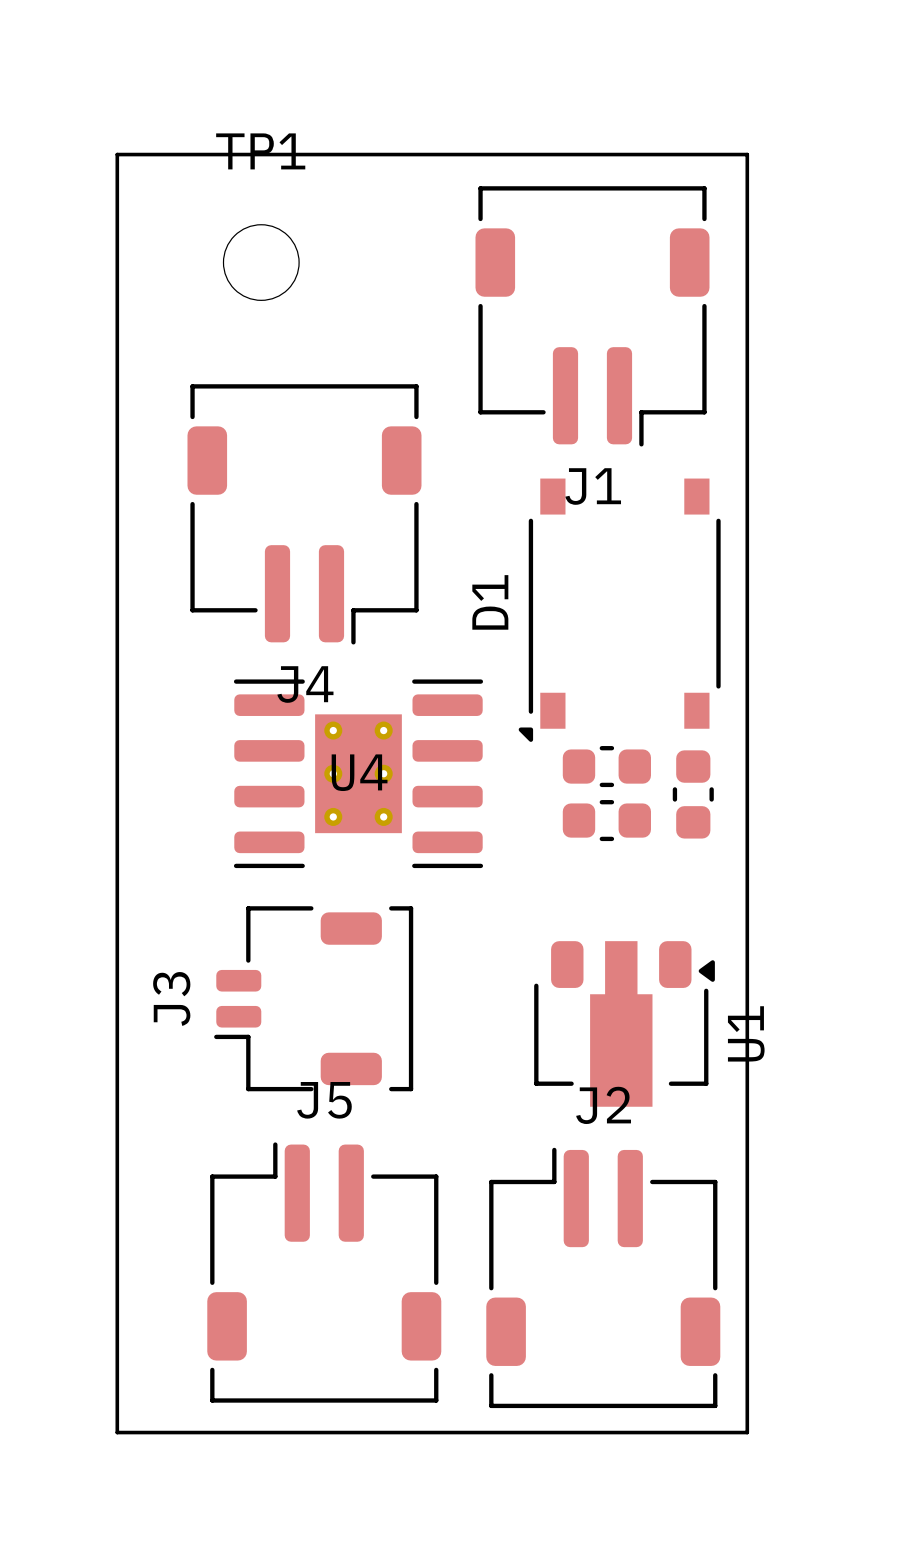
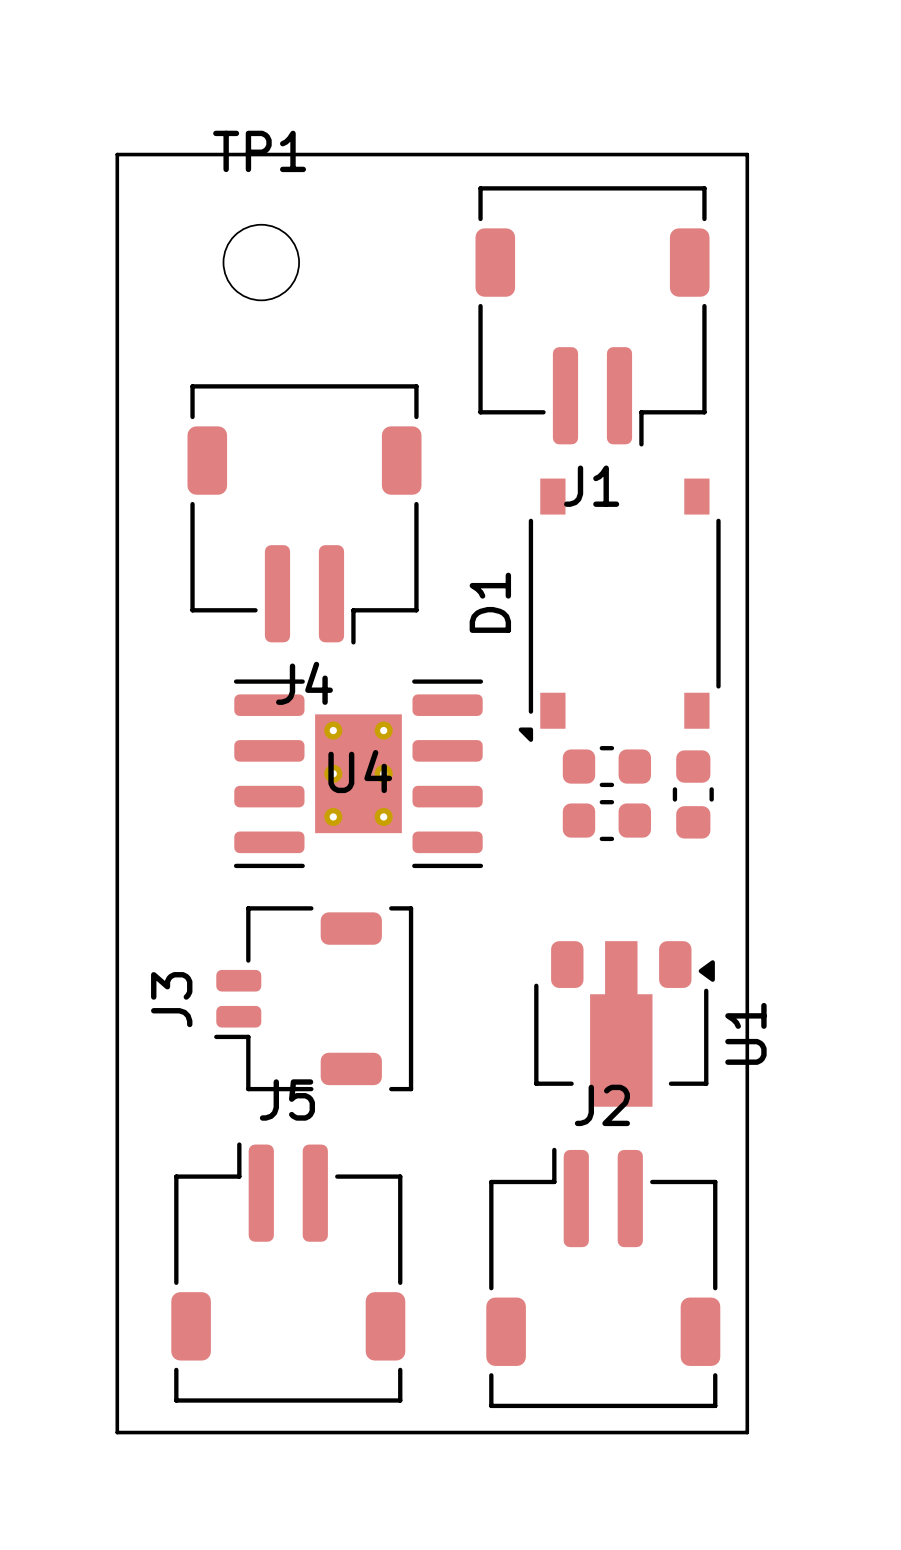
J5 position: (324, 1272) -> (288, 1272)

